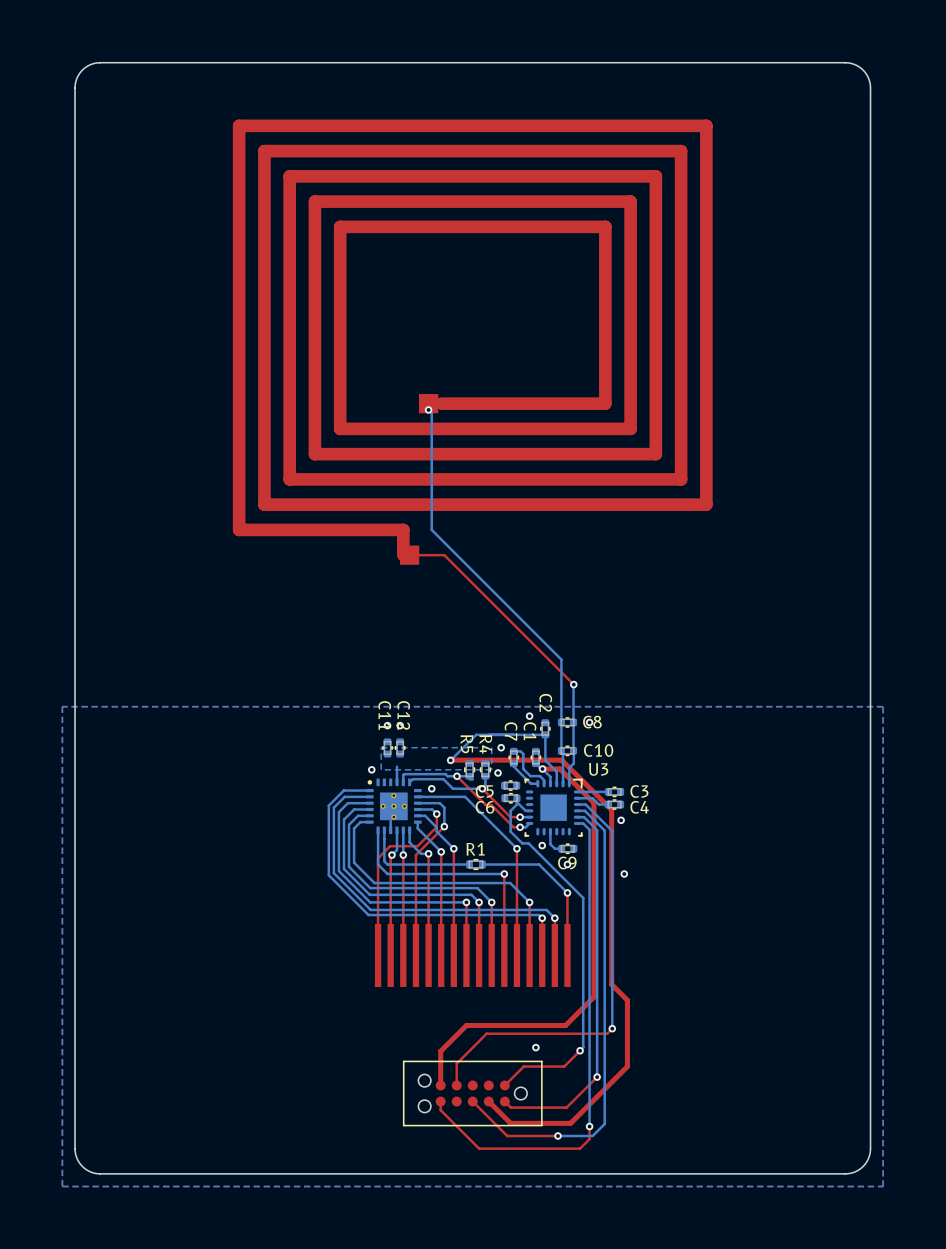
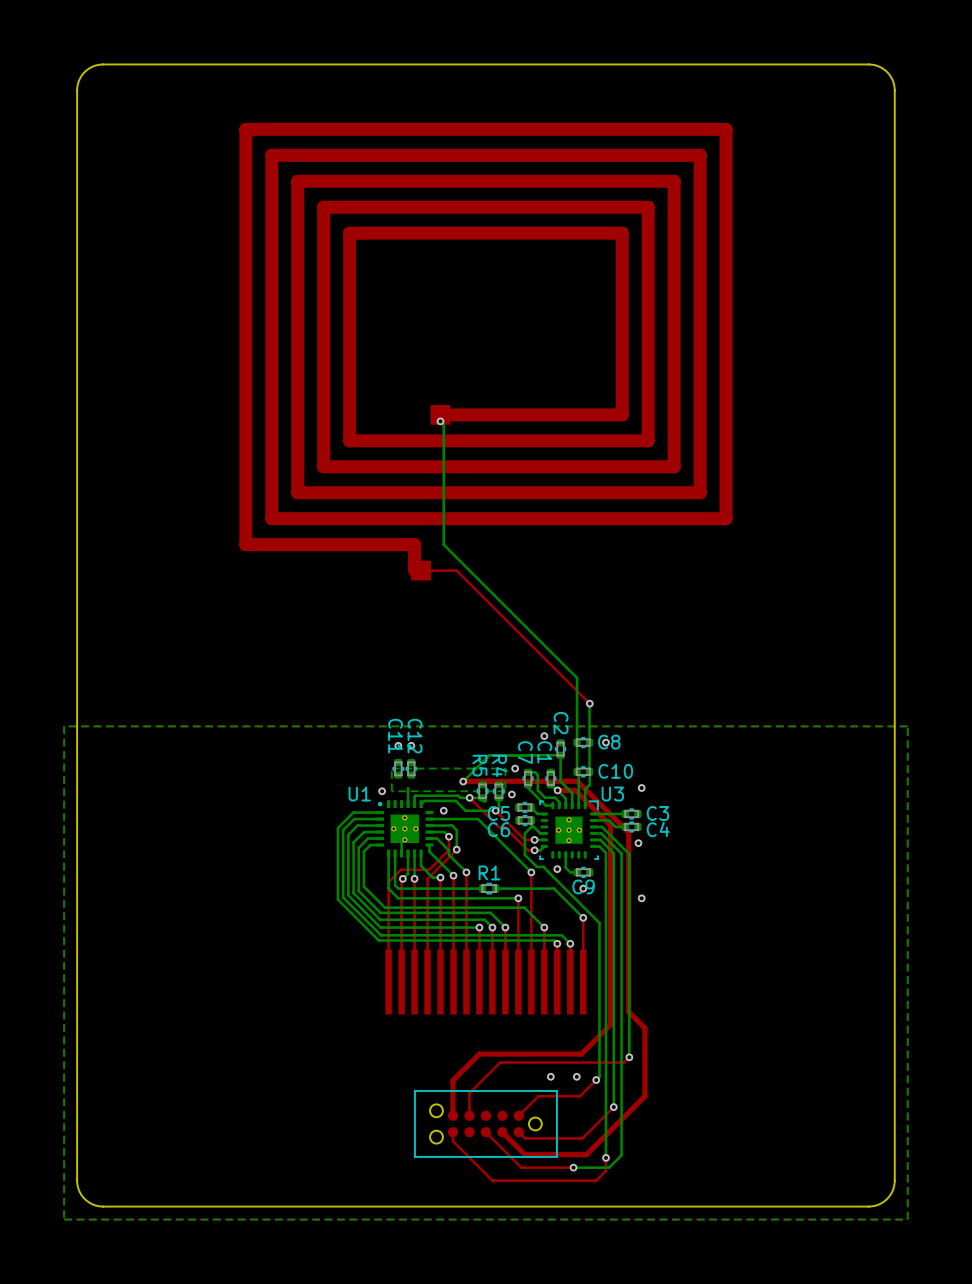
via: none -> (641, 788)
text: none -> U1 (359, 794)
U3 footprint: [524, 778, 583, 837] -> [539, 800, 599, 861]
bottom track: none -> (531, 807) (537, 813) (544, 813)
via: none -> (576, 1076)

